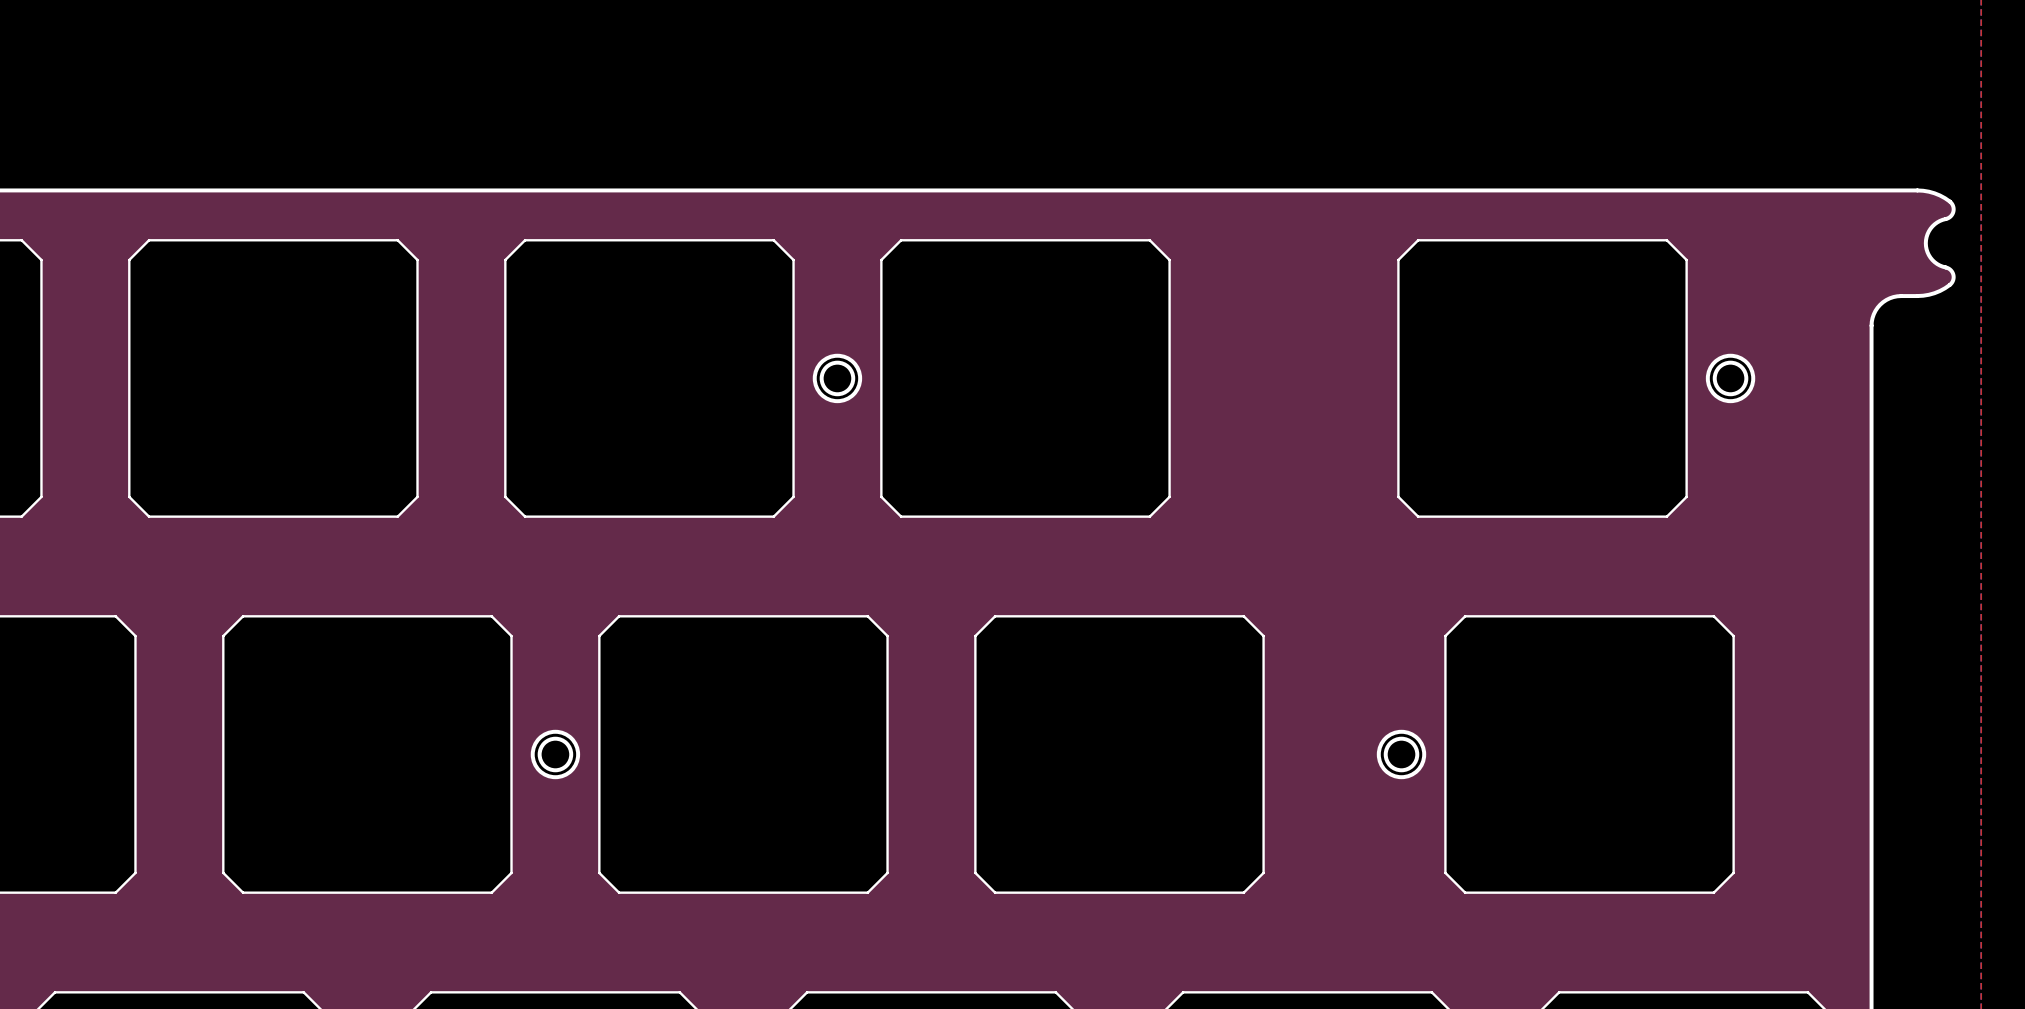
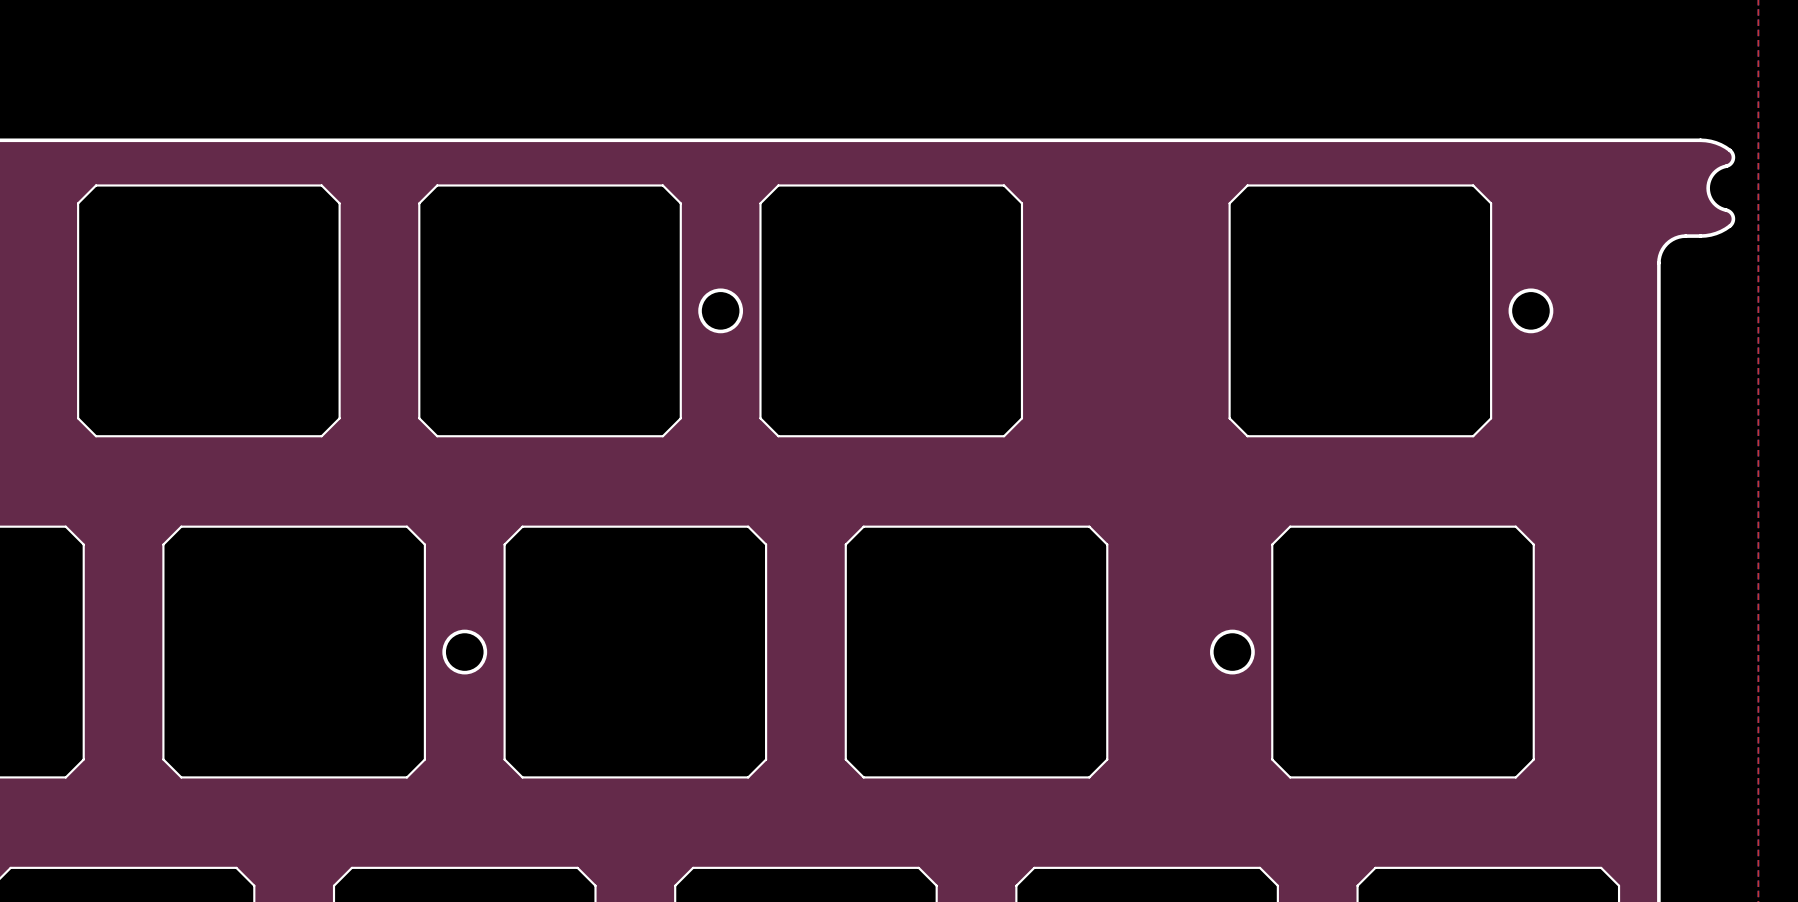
round board edge: [819, 360, 856, 397] -> none
round board edge: [1712, 360, 1749, 397] -> none
round board edge: [537, 736, 574, 773] -> none
round board edge: [1383, 736, 1420, 773] -> none

